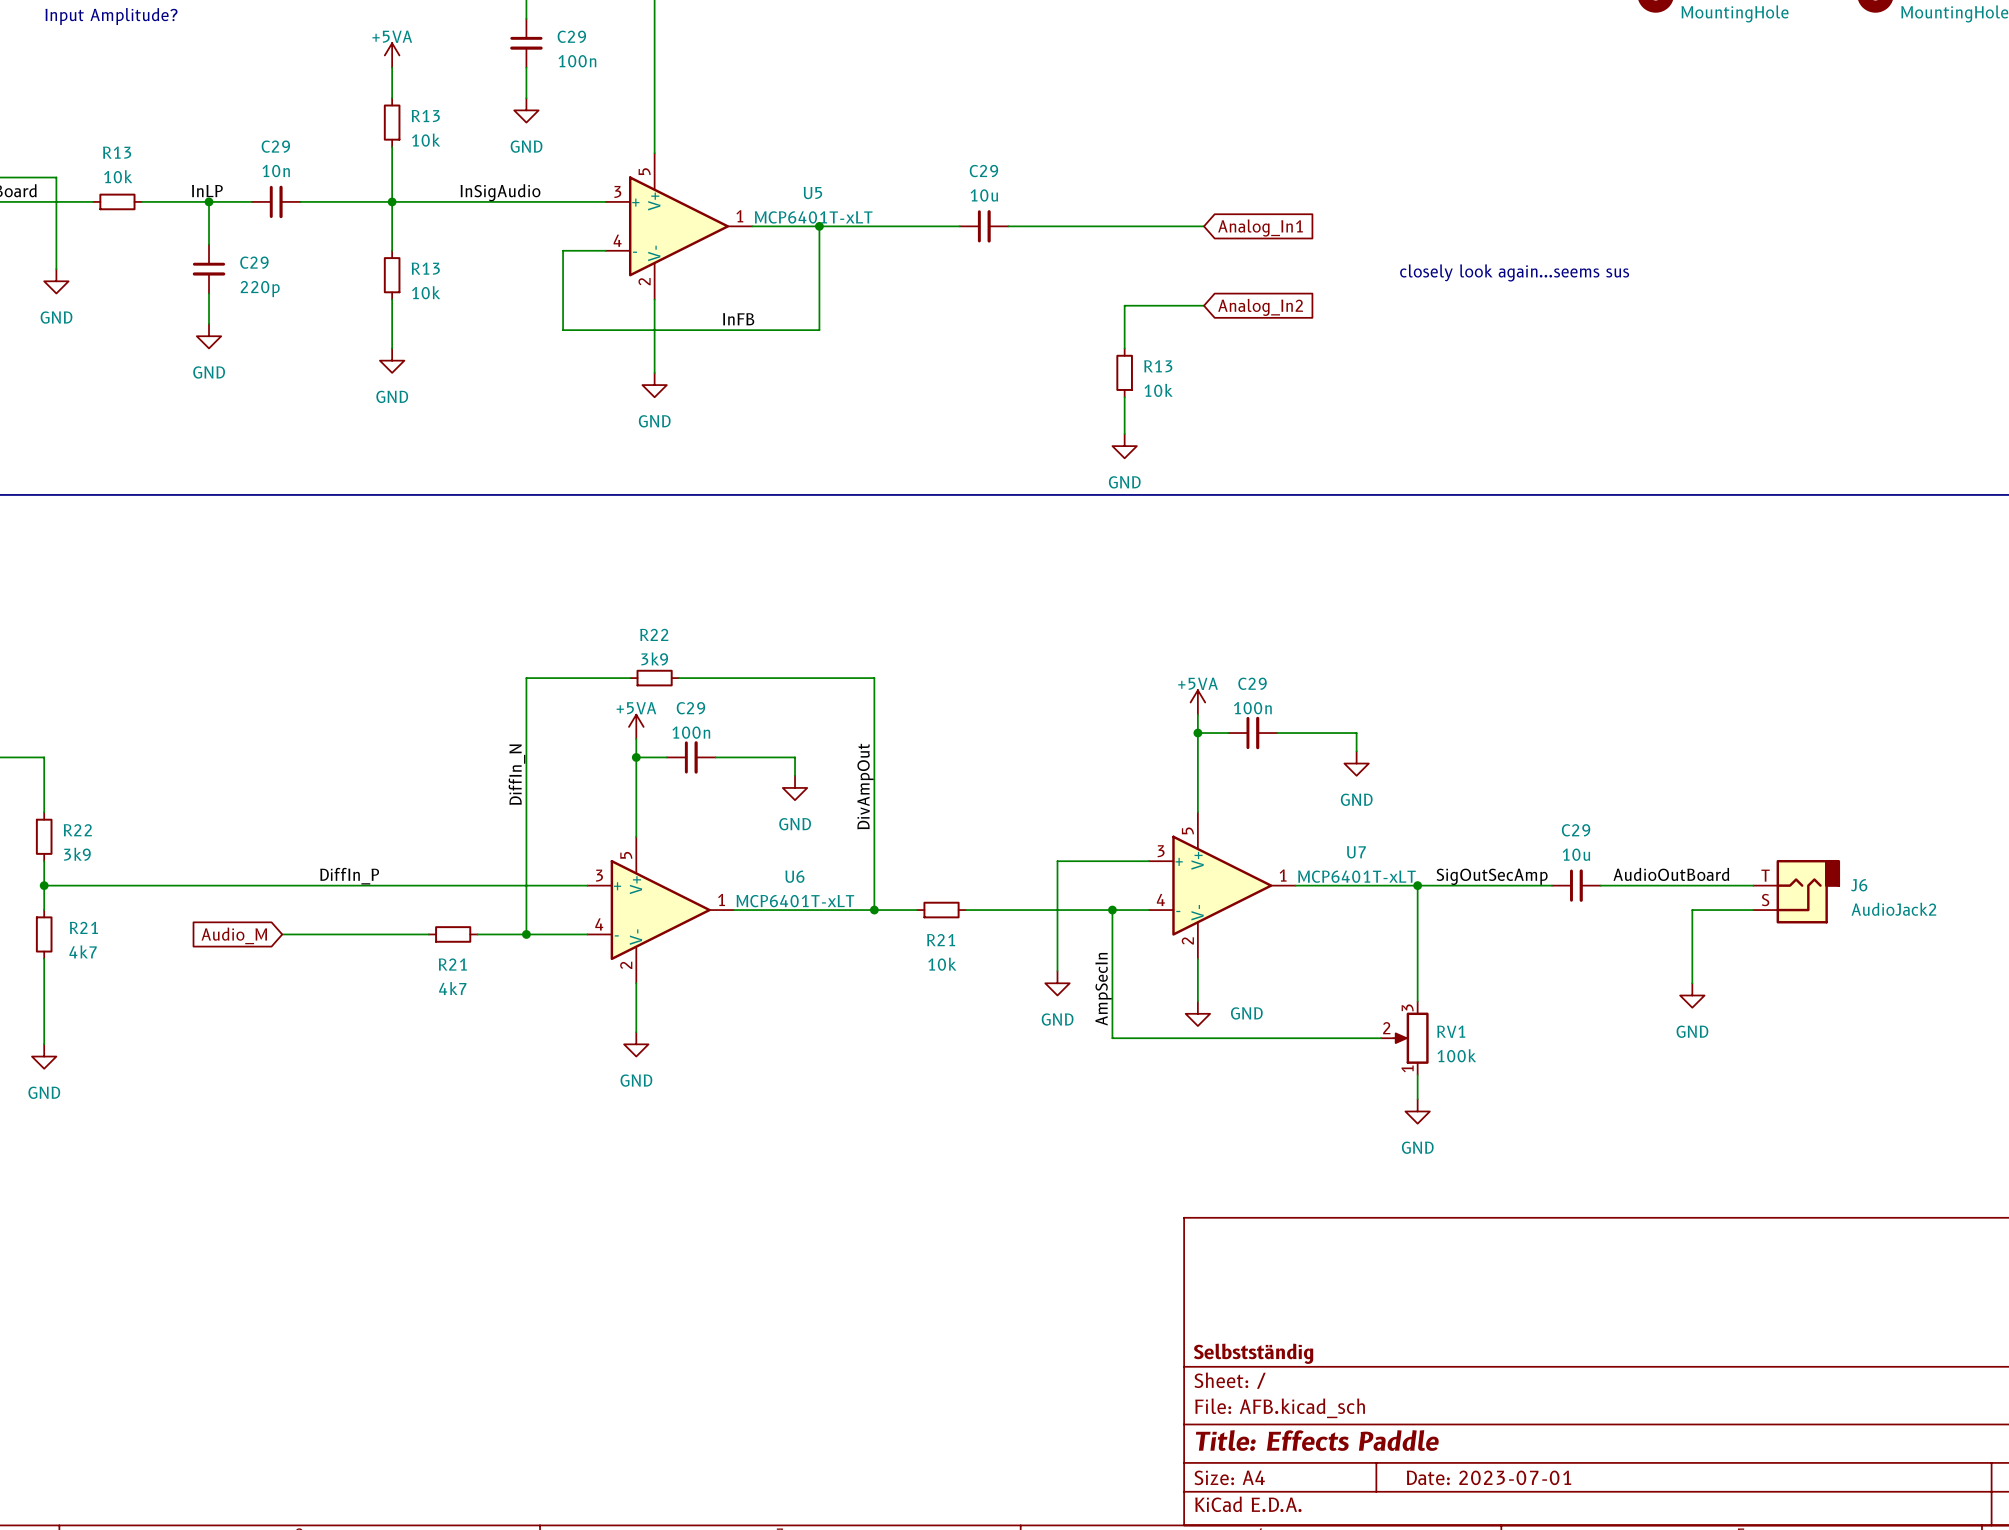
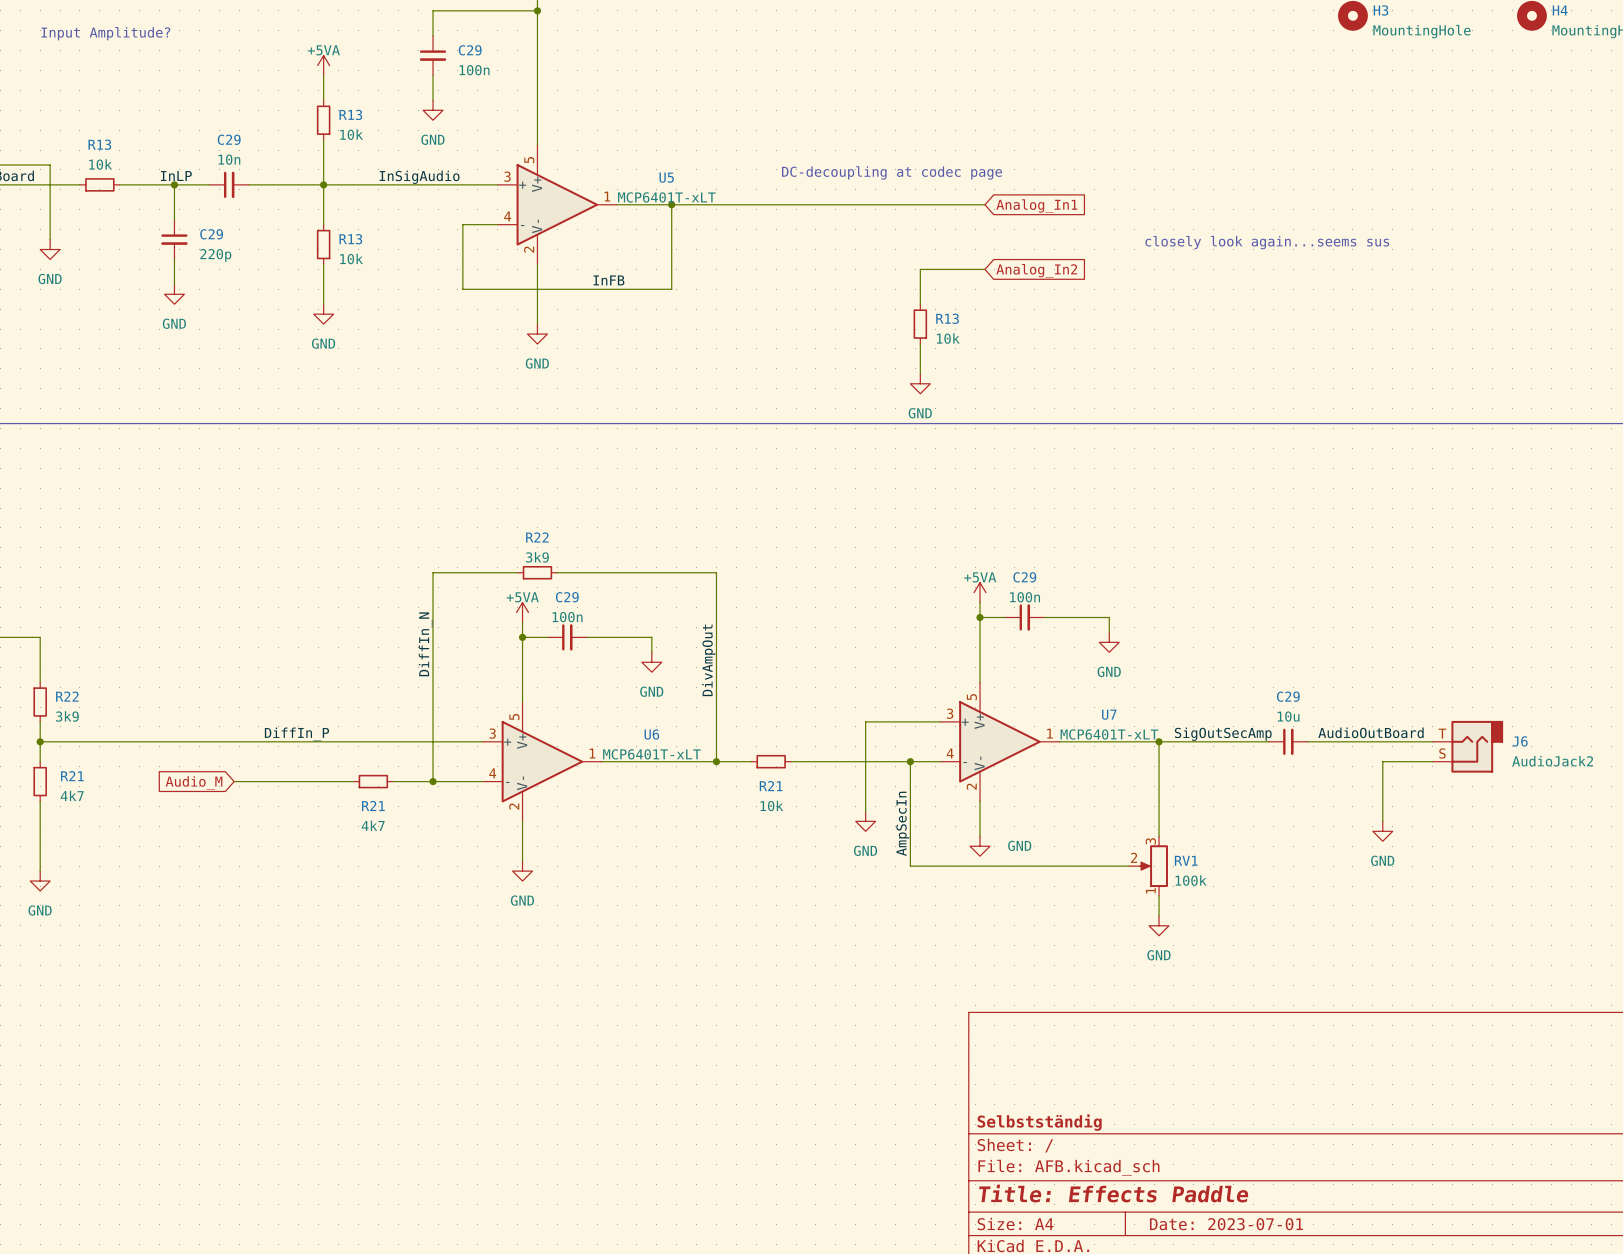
text: none -> DC-decoupling at codec page (892, 172)
C29: 10u (984, 226) -> none

